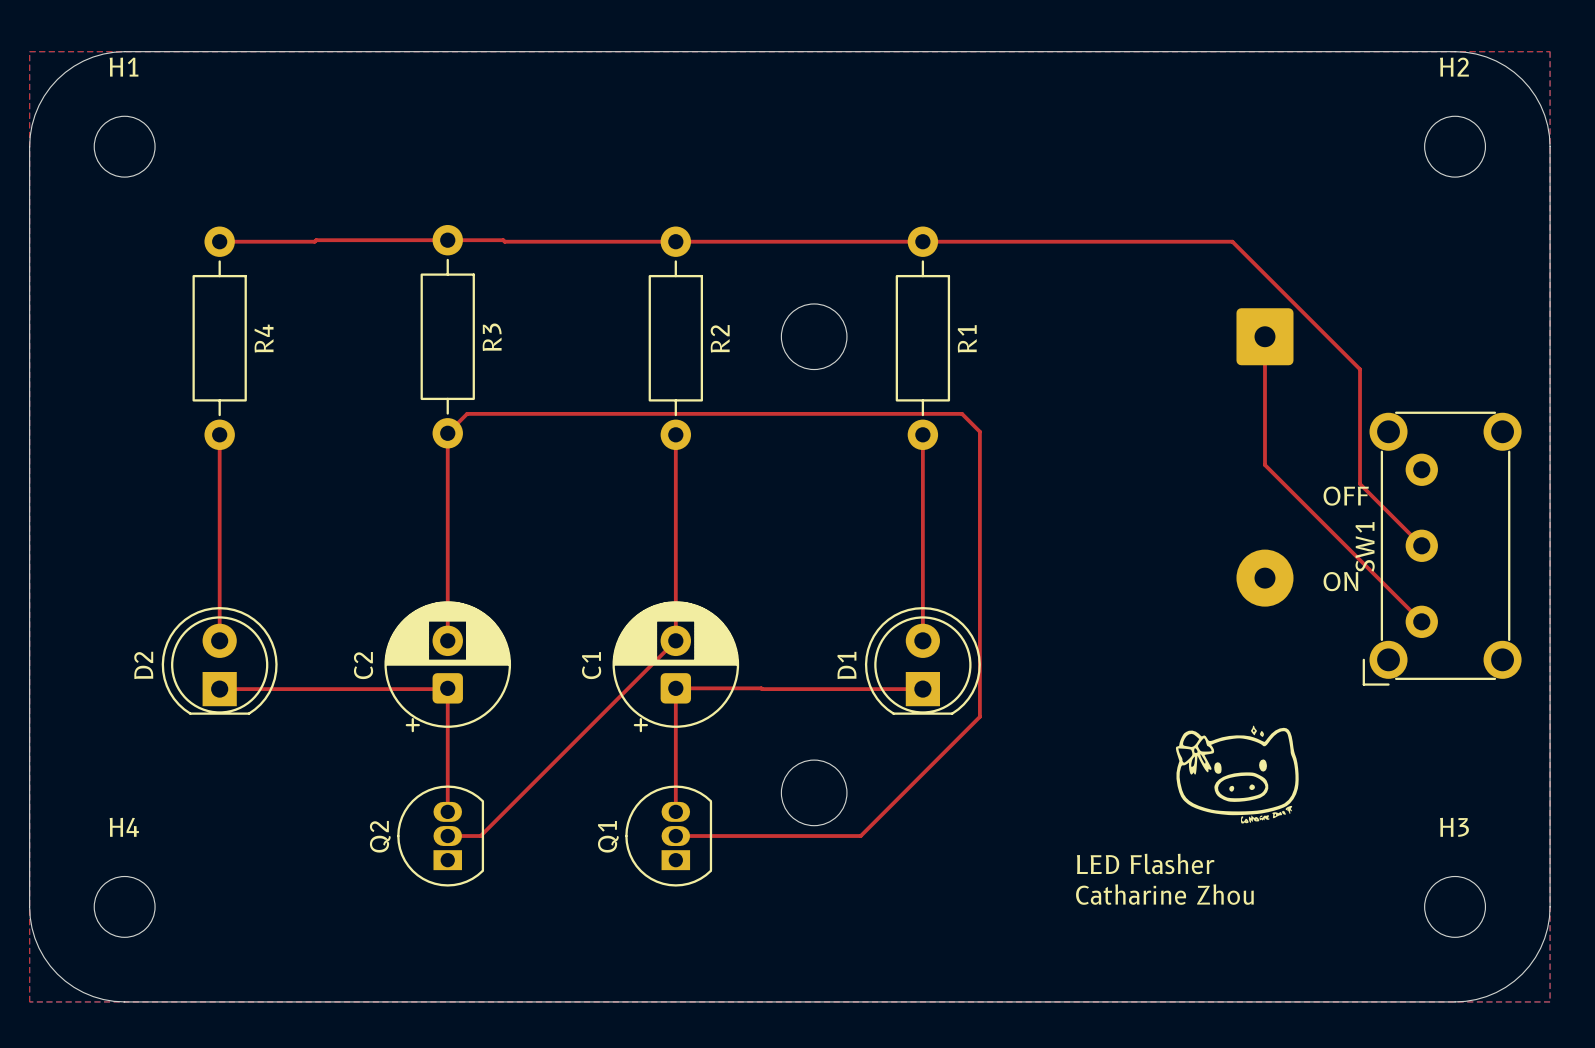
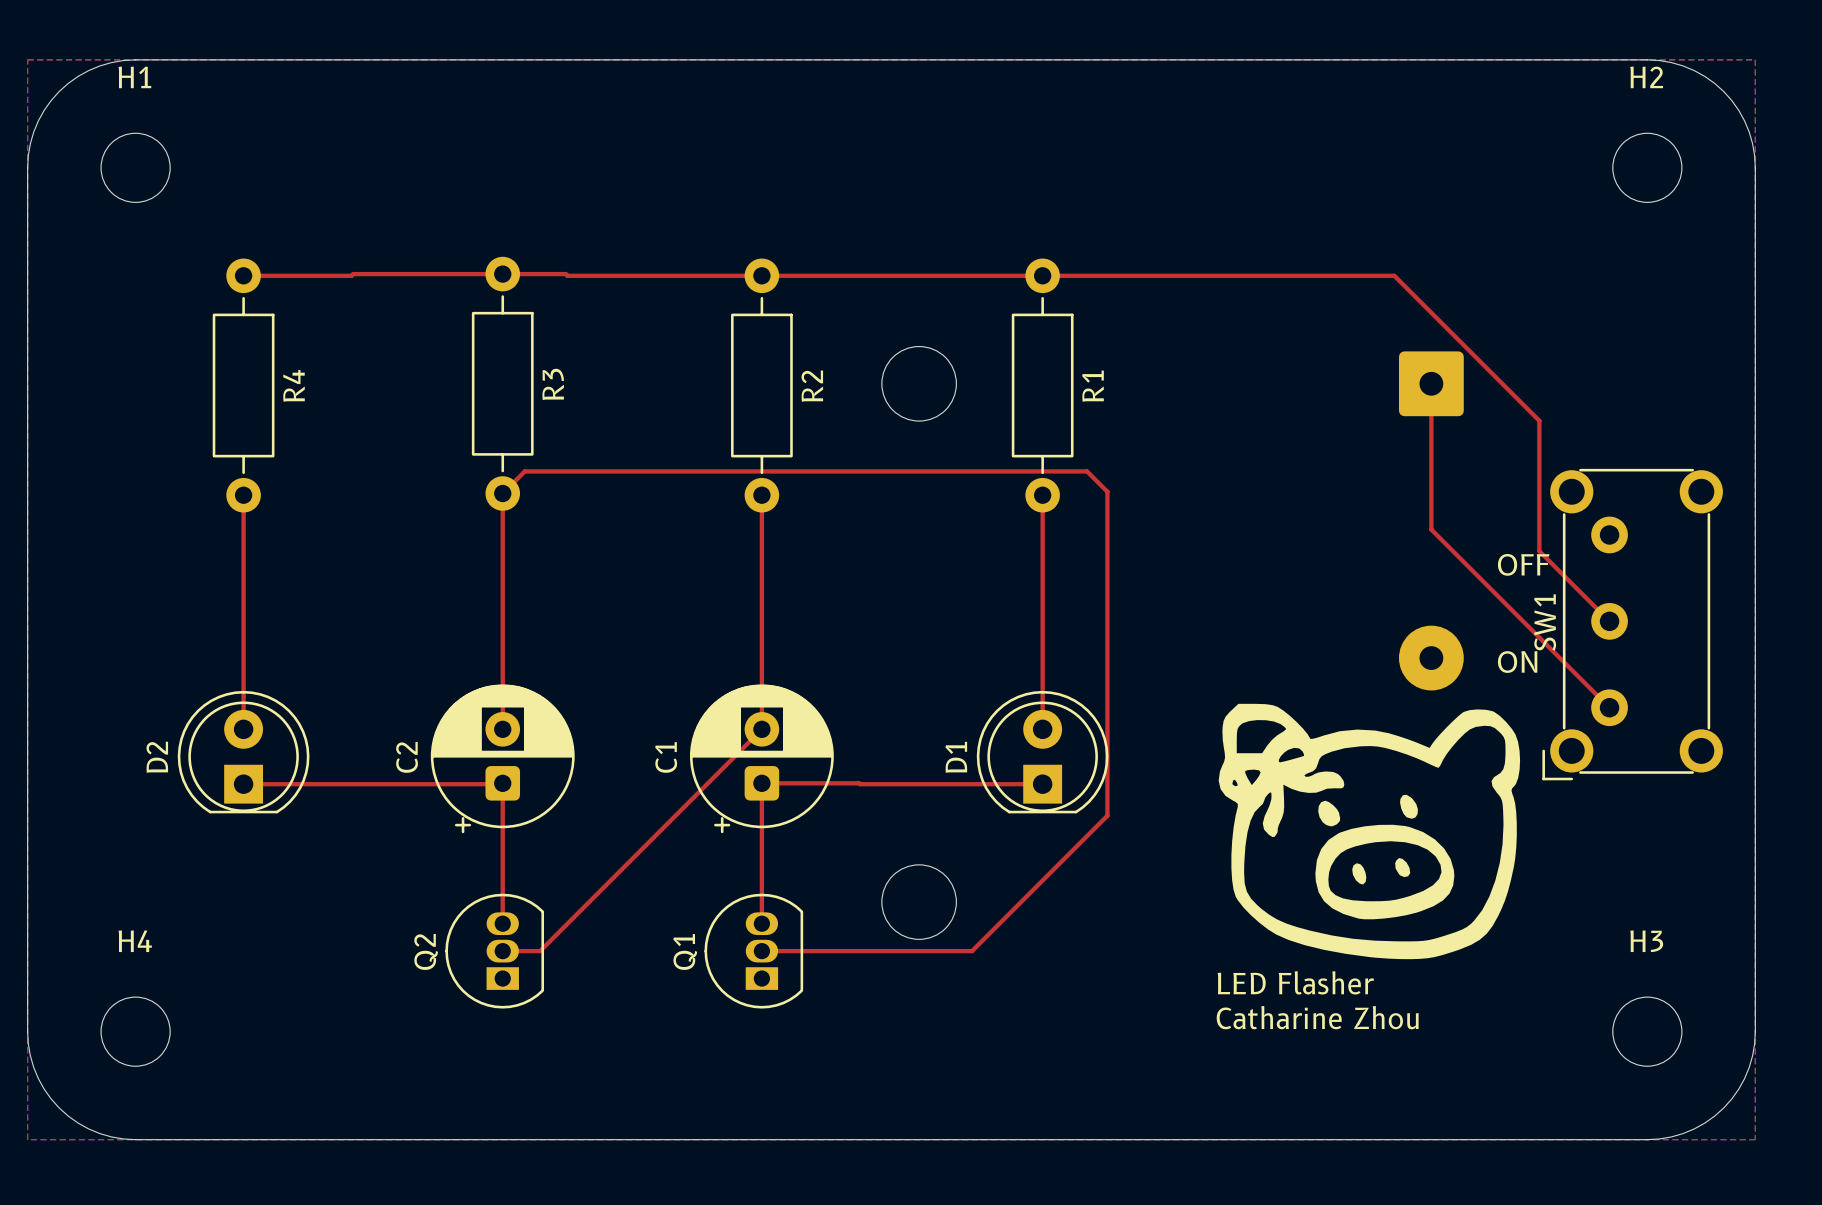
drawing: none -> [1218, 703, 1521, 960]
drawing: [1175, 725, 1299, 824] -> none

